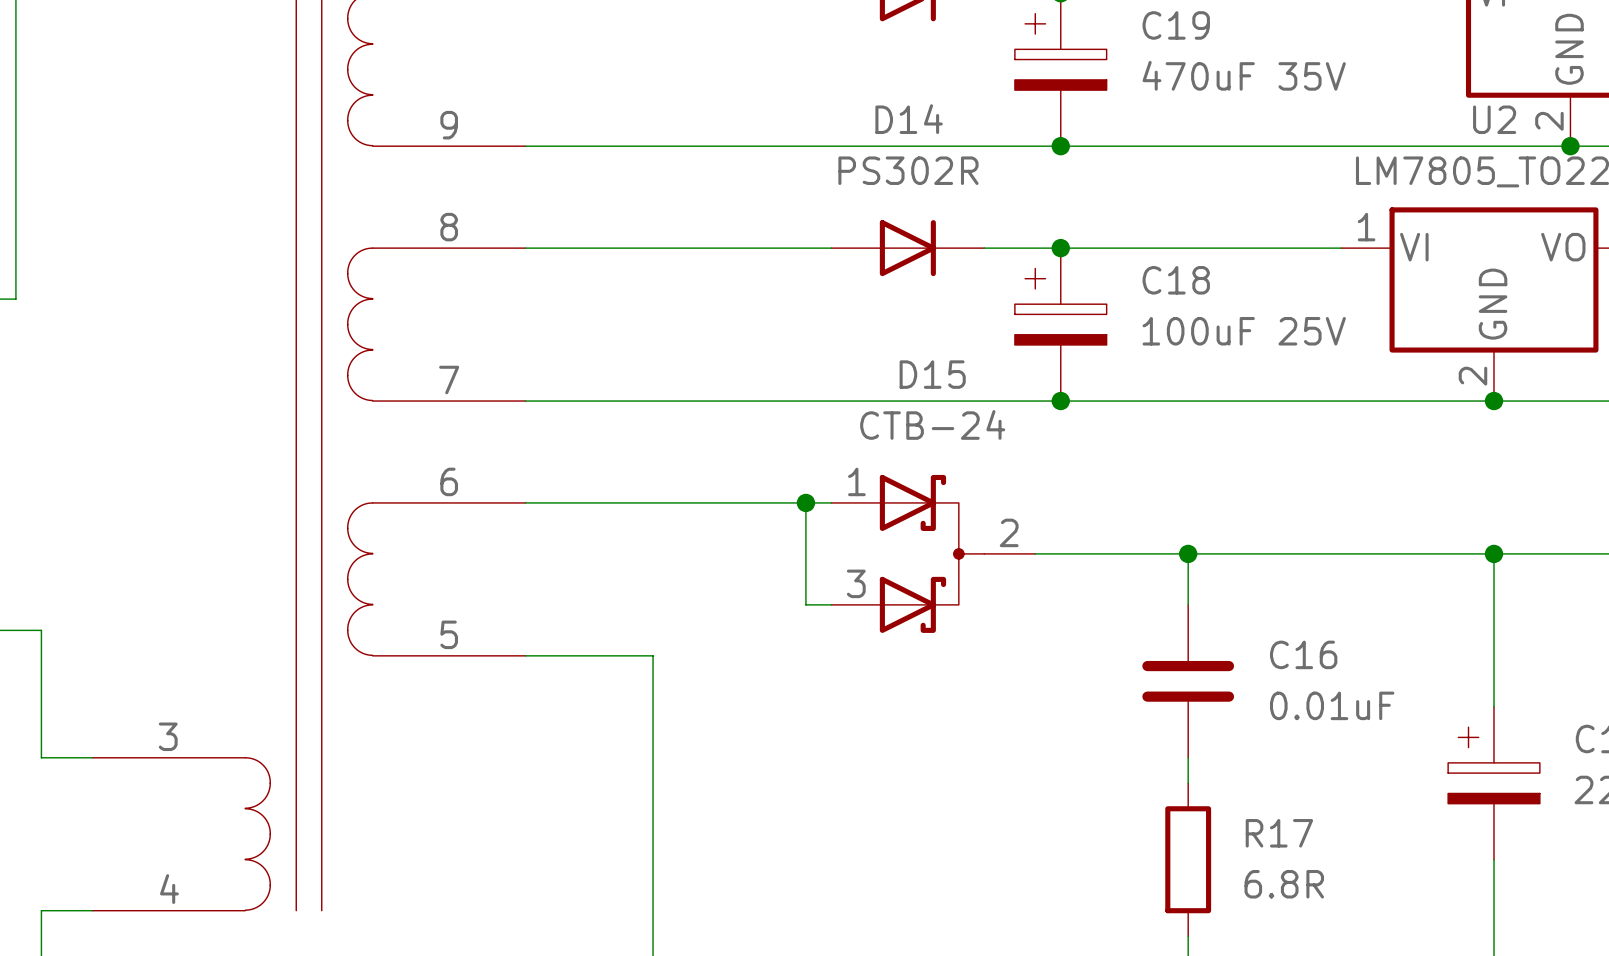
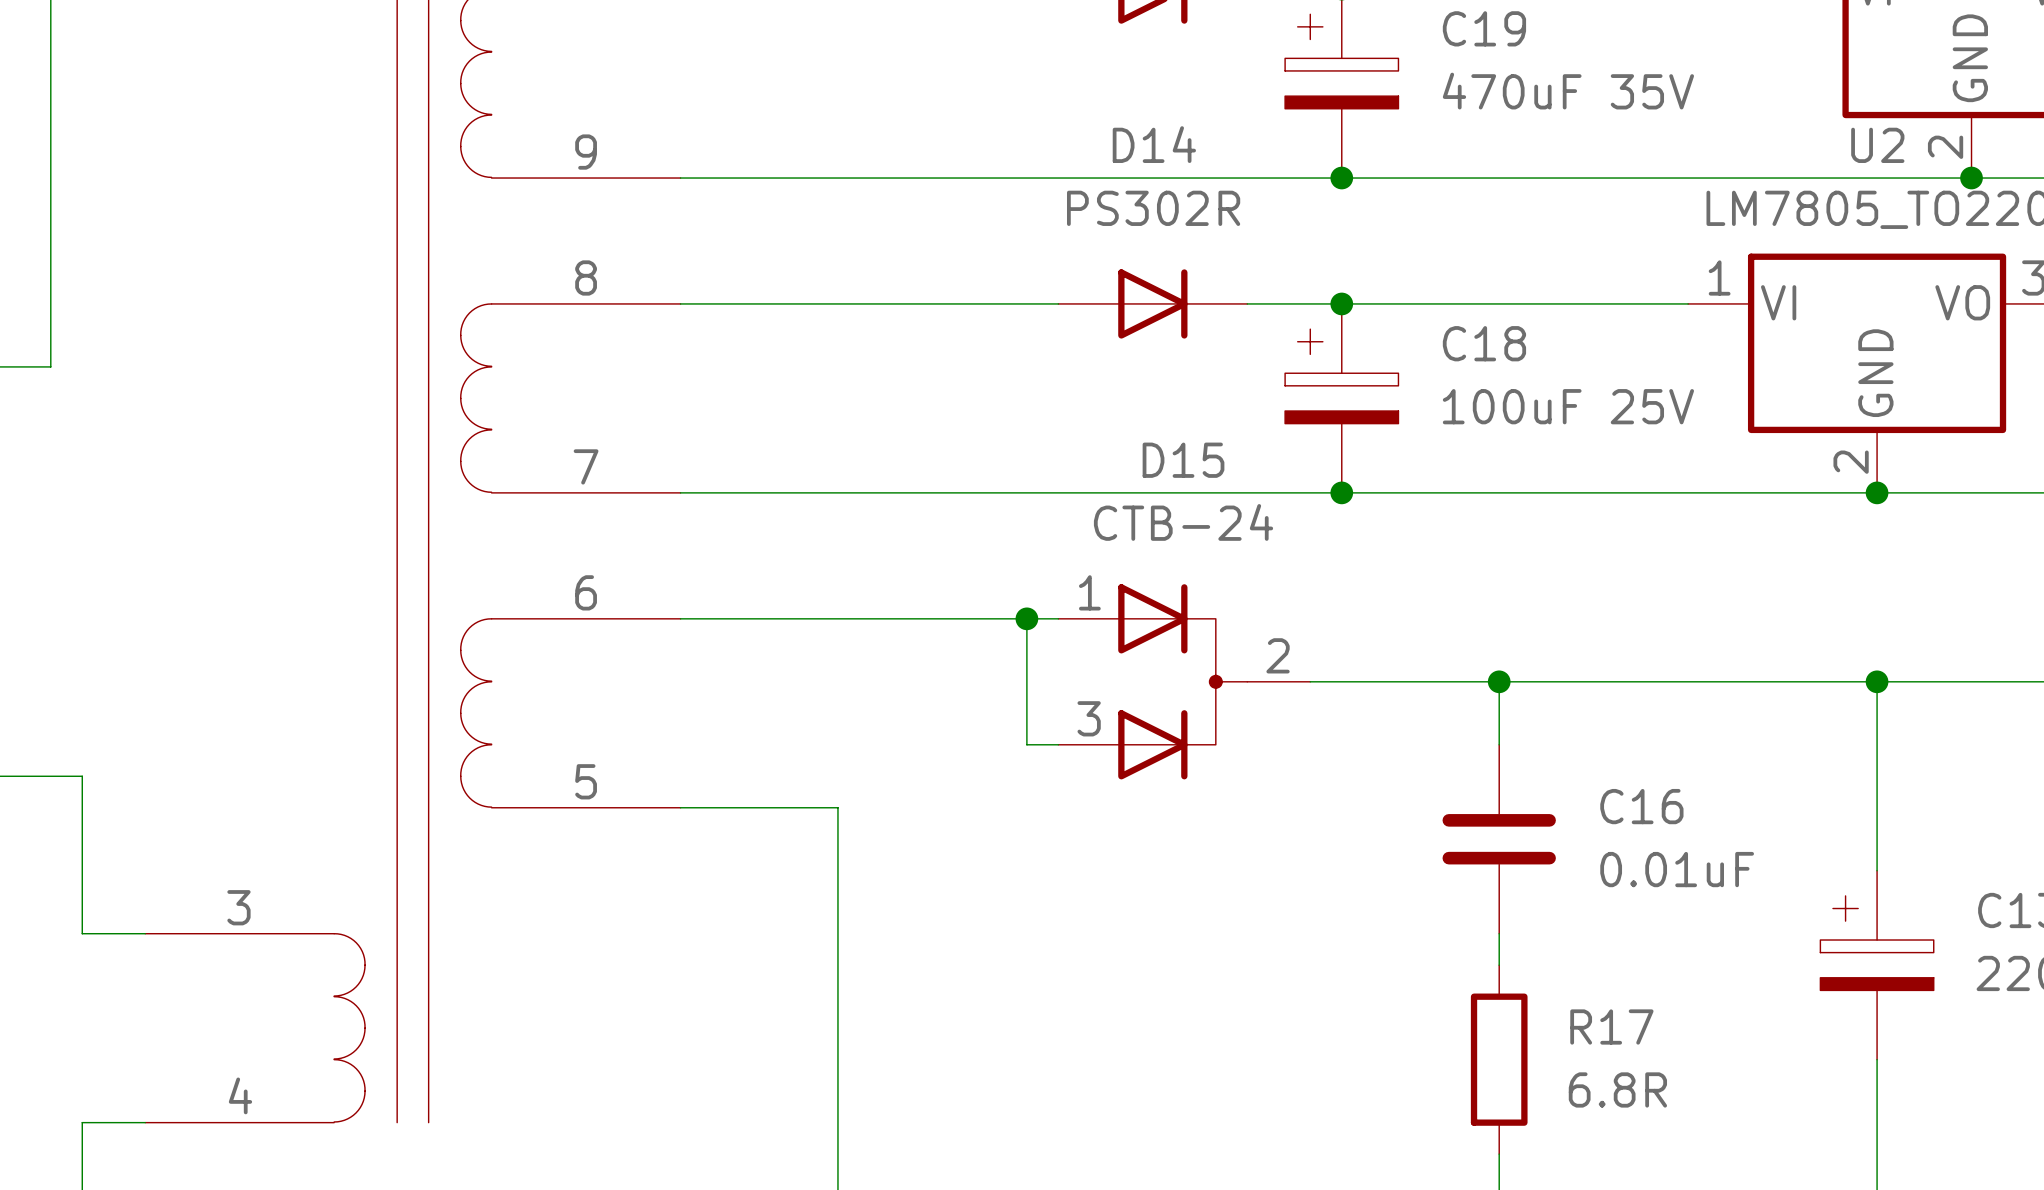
D15 symbol: [831, 474, 1036, 633] -> [1058, 584, 1311, 780]

